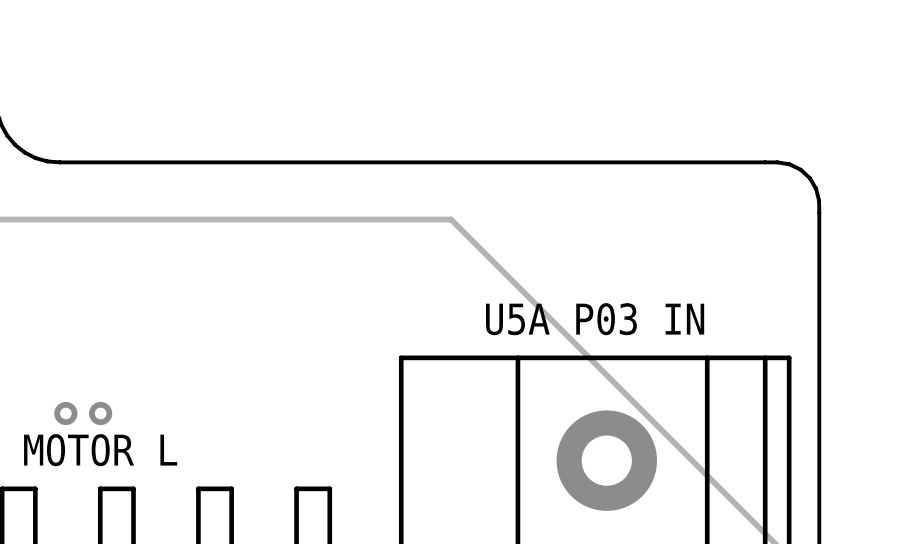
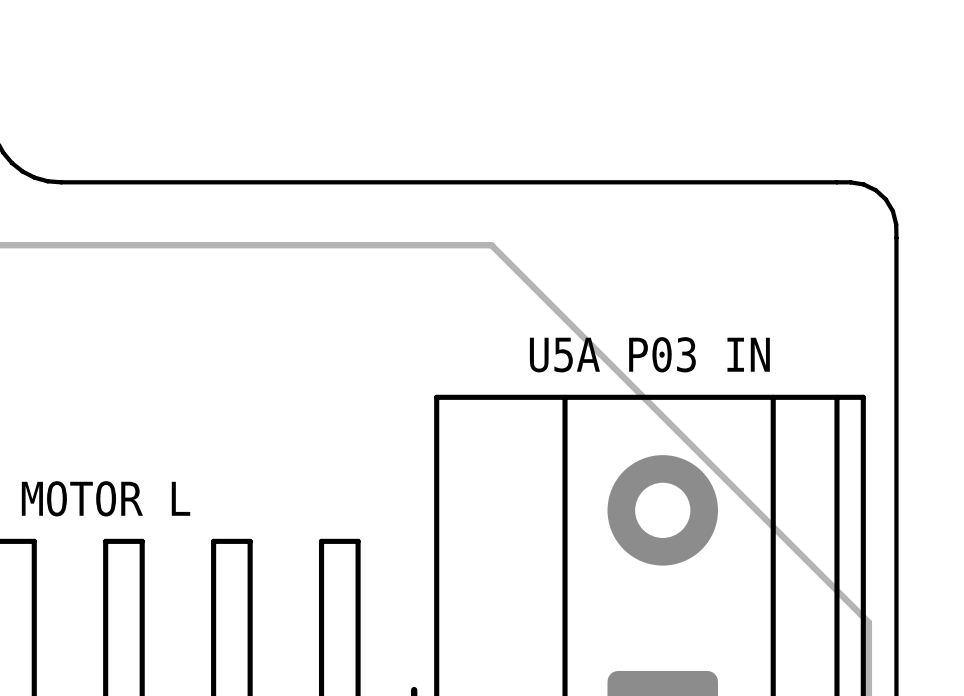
via: (65, 413) -> none
via: (100, 413) -> none

